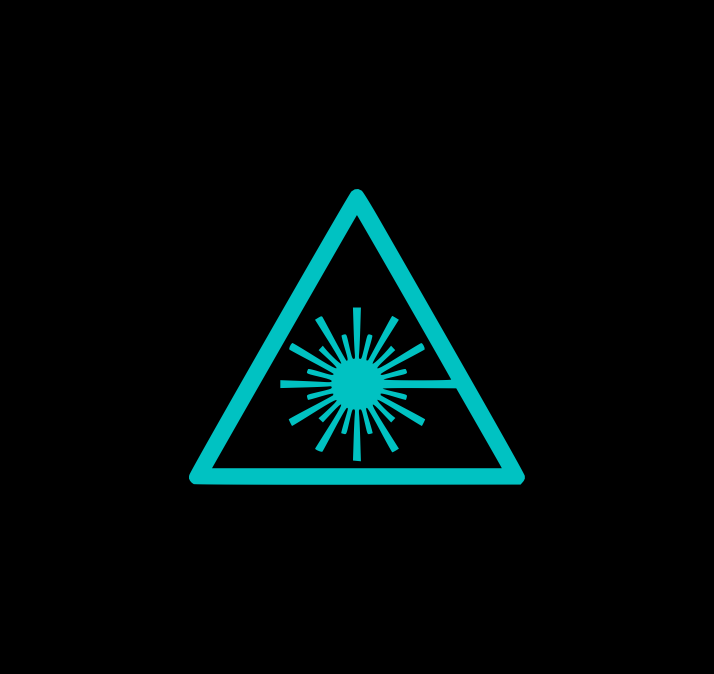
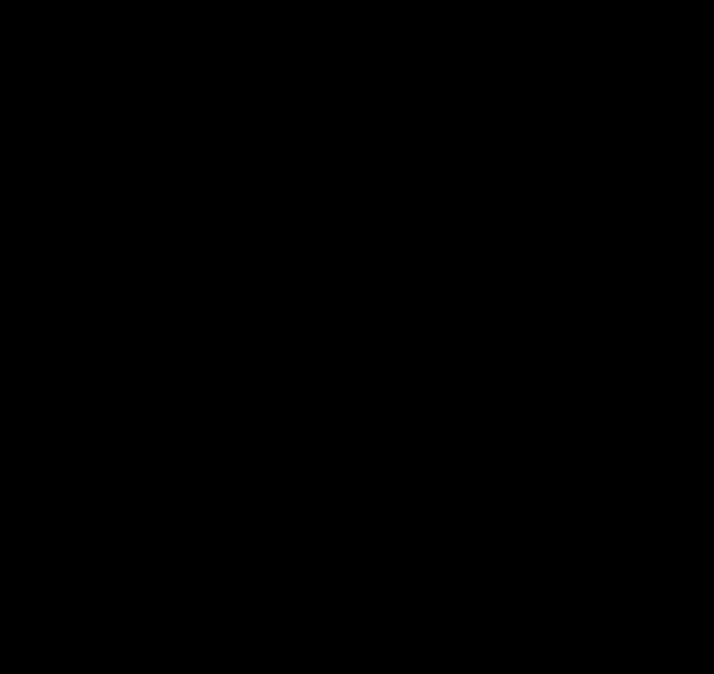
drawing: [189, 189, 525, 485] -> none

